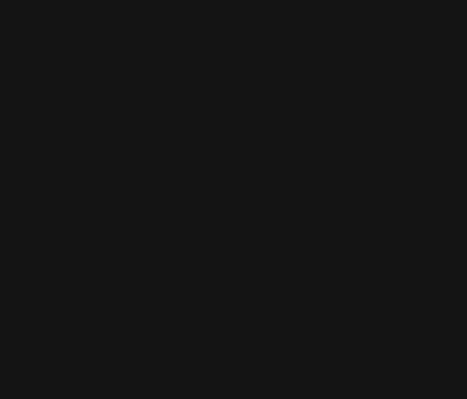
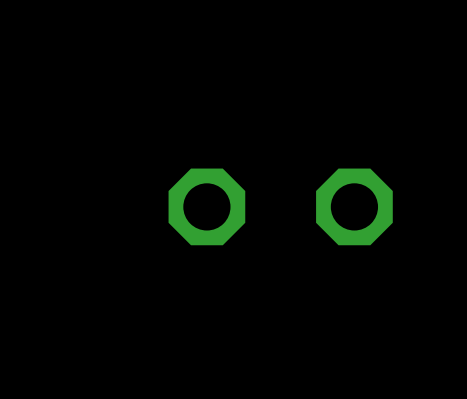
part: none -> (280, 206)

